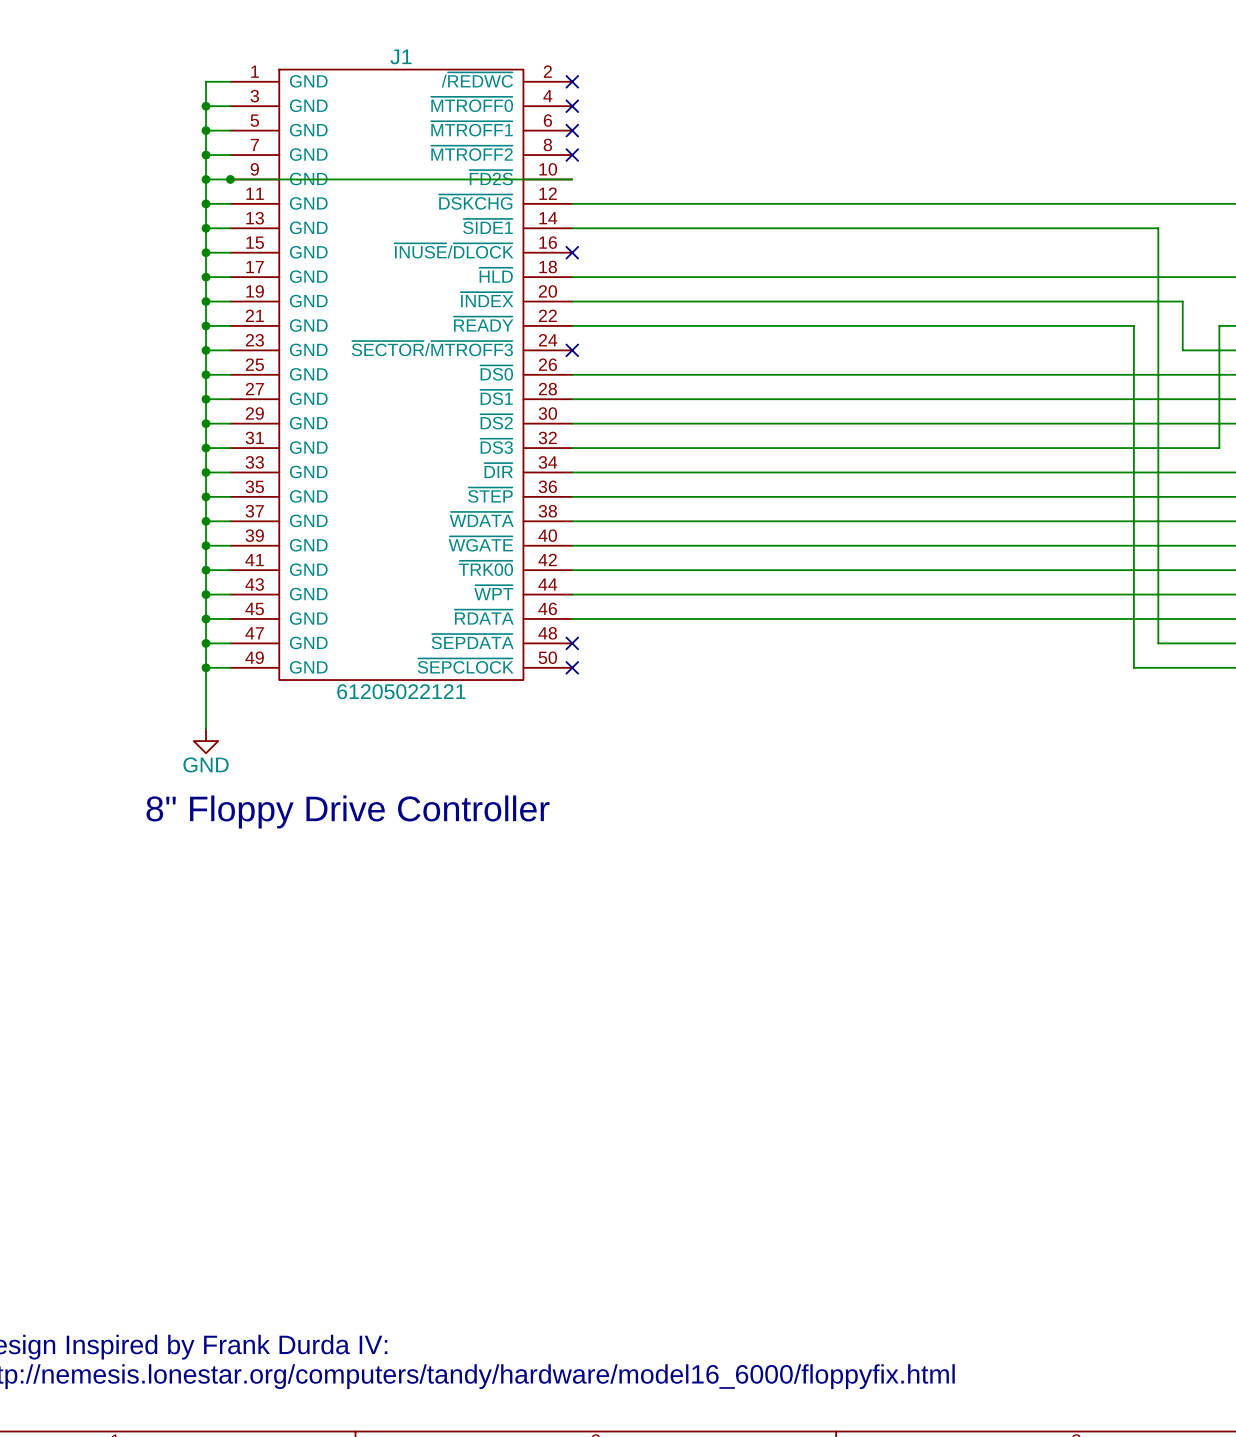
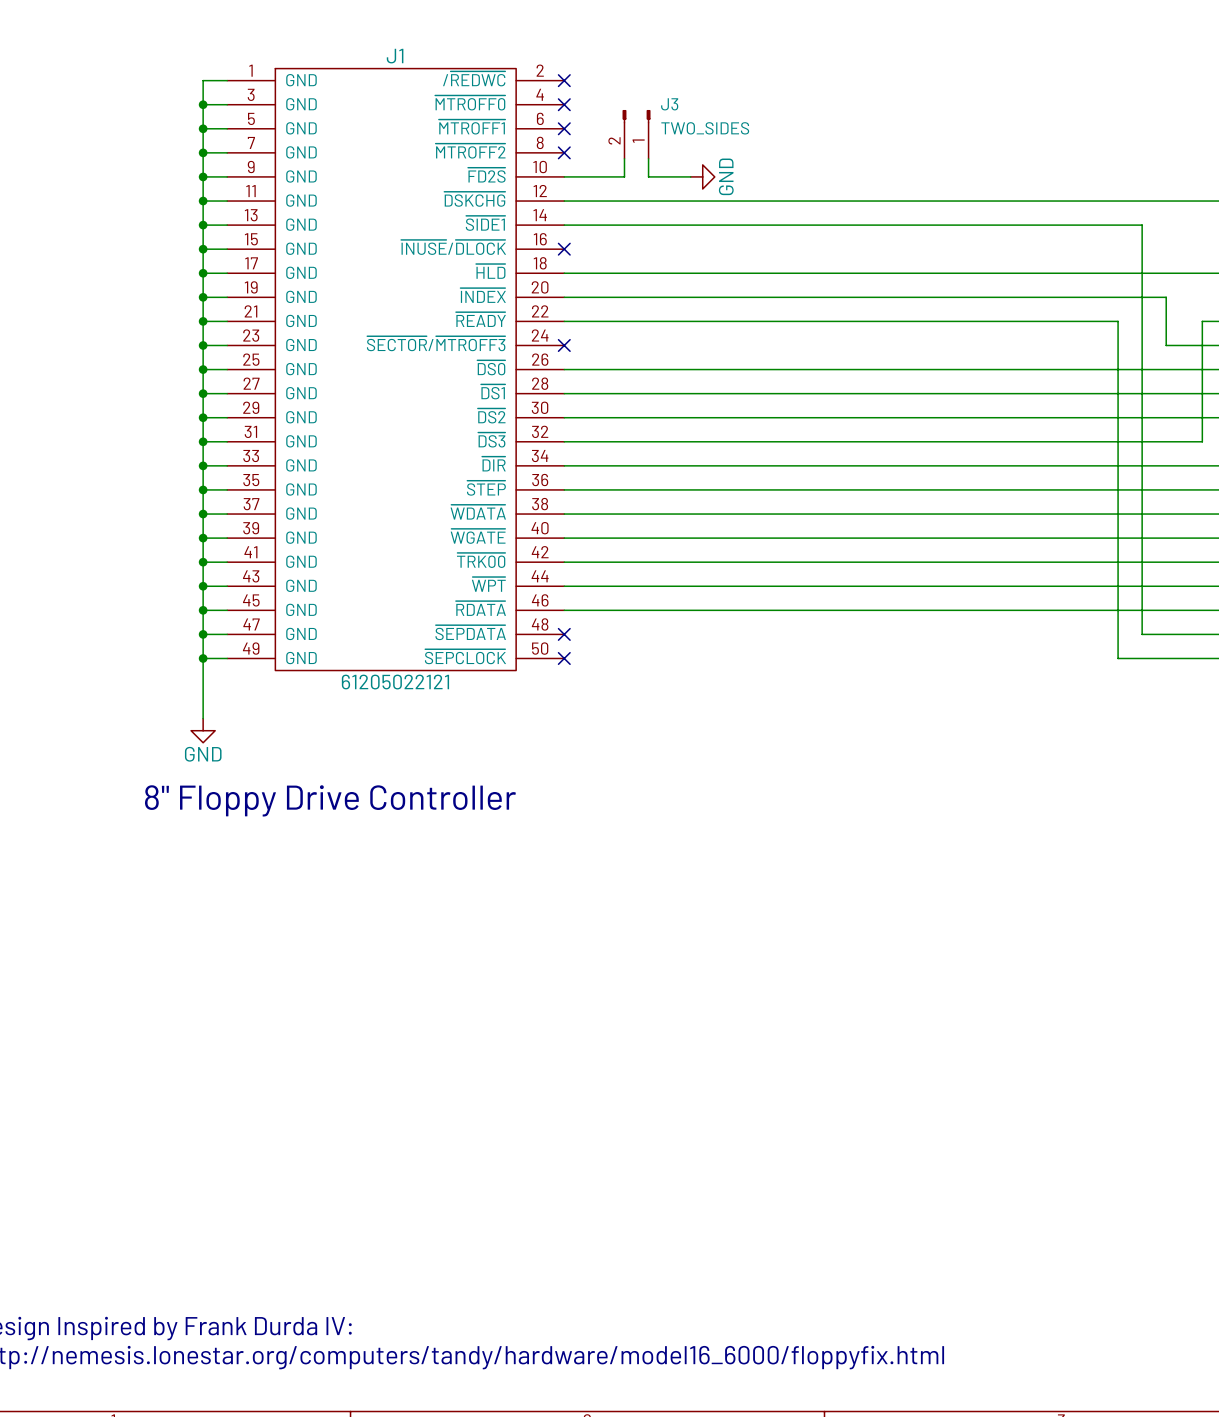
J3: none -> TWO_SIDES (636, 134)
wire: none -> (648, 158) (648, 176) (690, 176)
wire: (230, 179) (572, 179) -> (624, 158) (624, 176) (564, 176)
junction: (230, 179) -> none
power symbol: none -> GND (702, 176)

